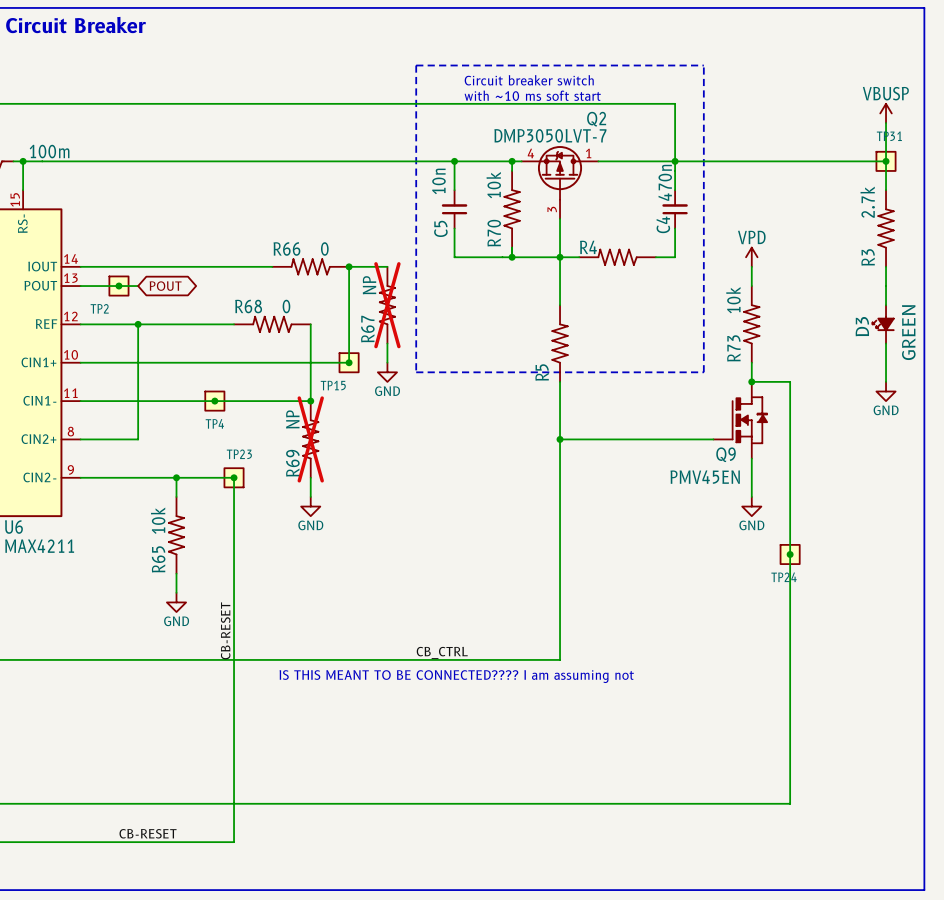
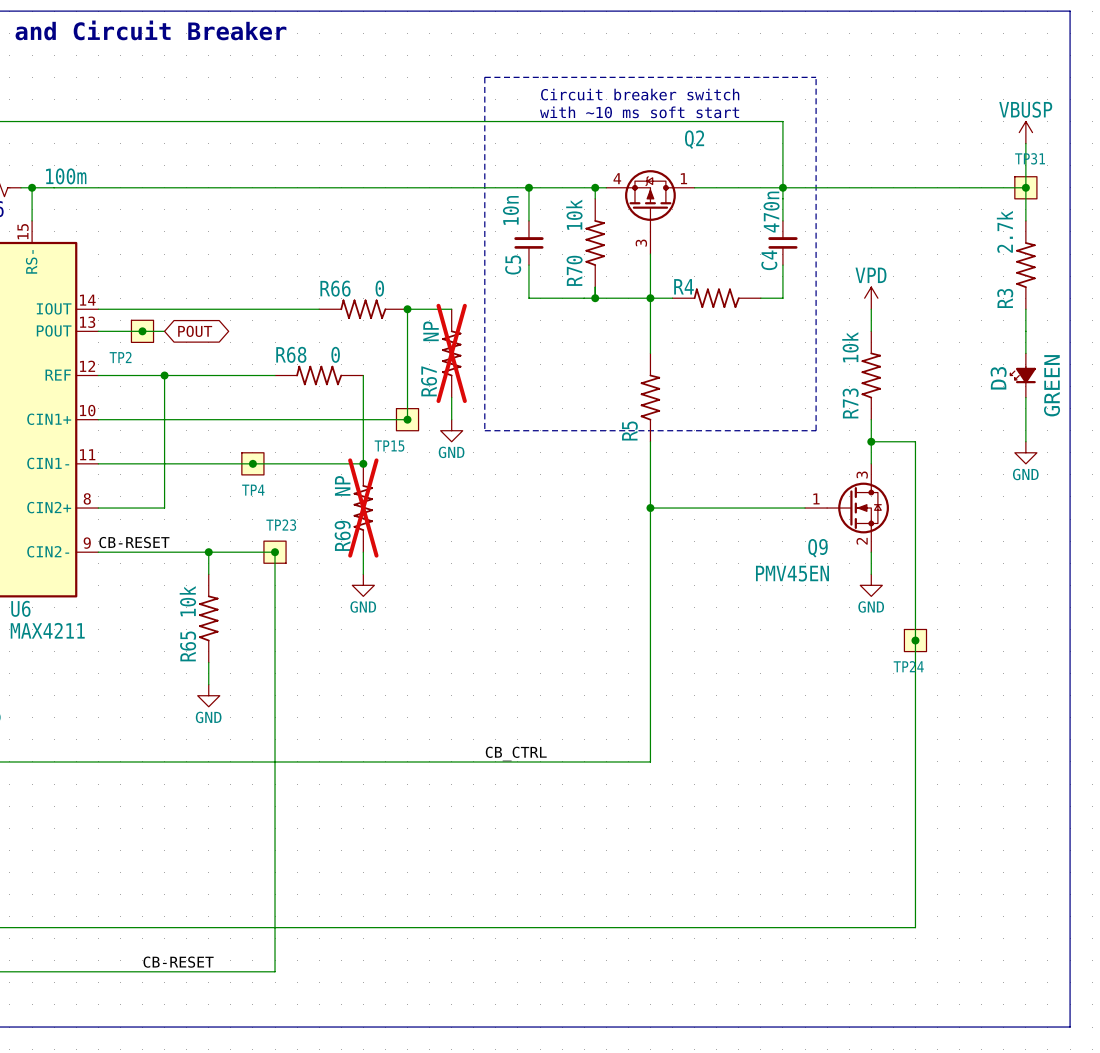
Q2 value: DMP3050LVT-7 (550, 135) -> none
Q9 symbol: [713, 381, 768, 459] -> [805, 463, 889, 553]
label: none -> CB-RESET (134, 542)
label: CB-RESET (225, 630) -> none
text: IS THIS MEANT TO BE CONNECTED???? I am assuming not (456, 676) -> none

